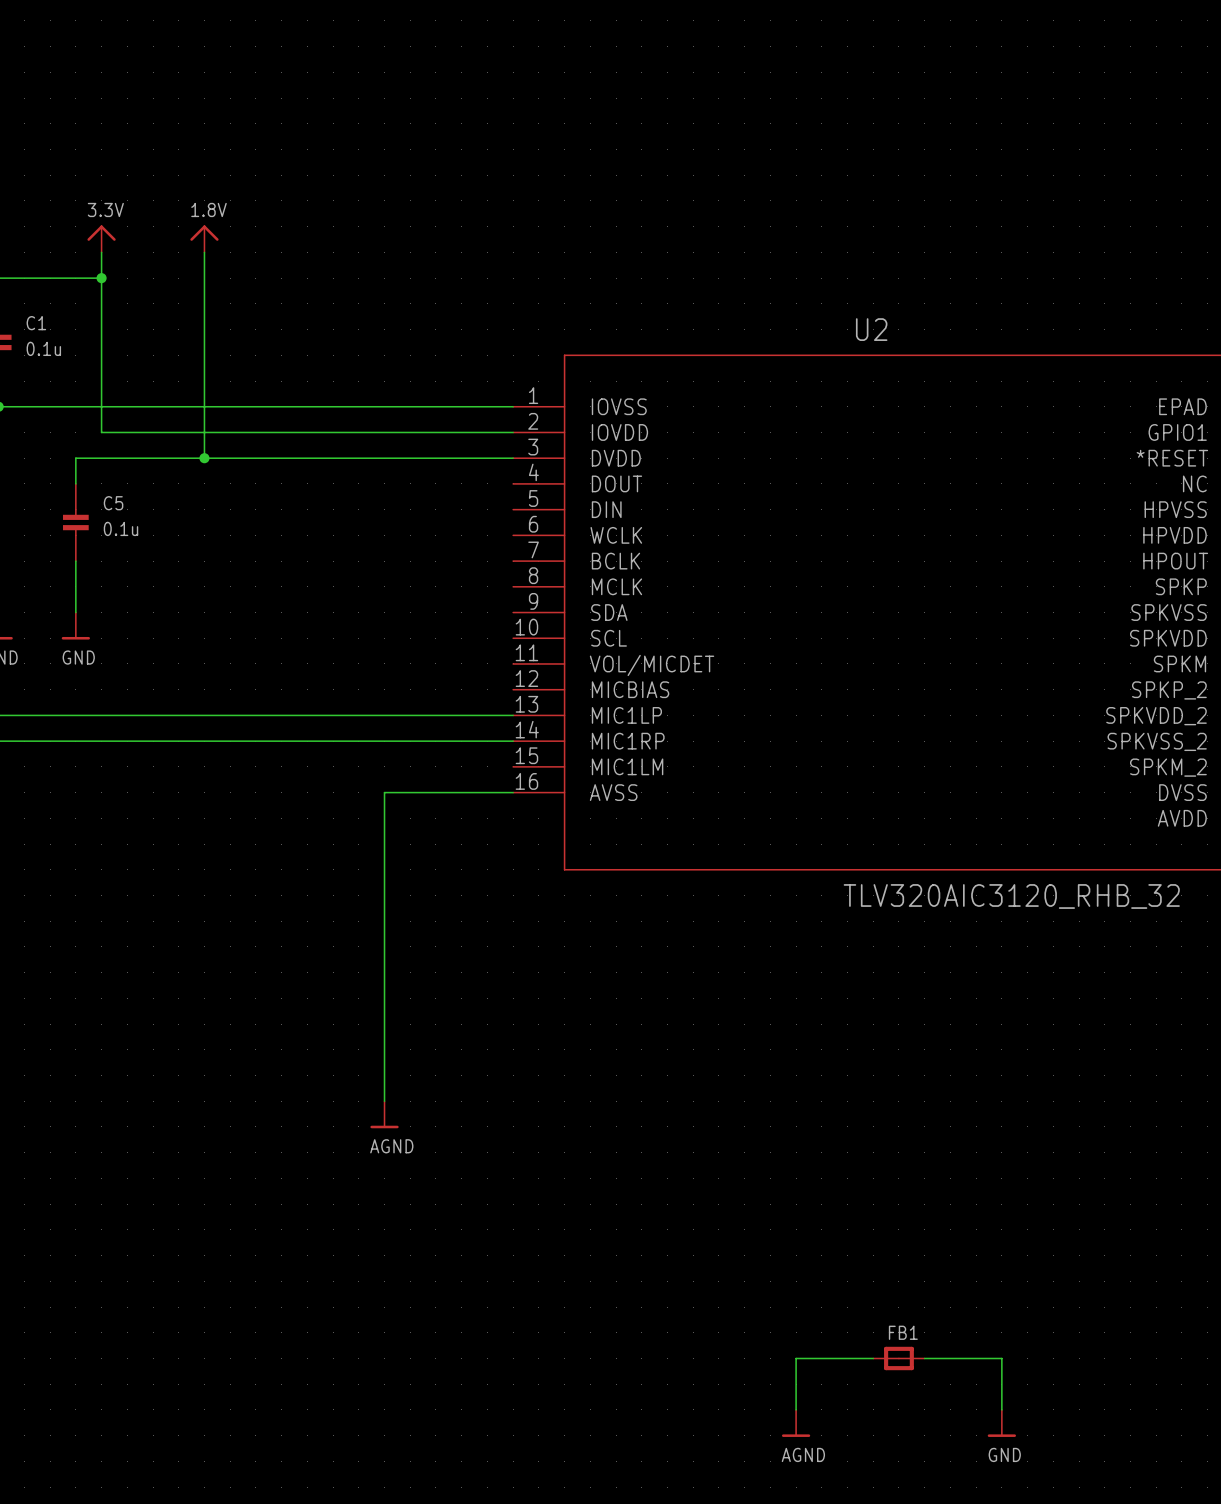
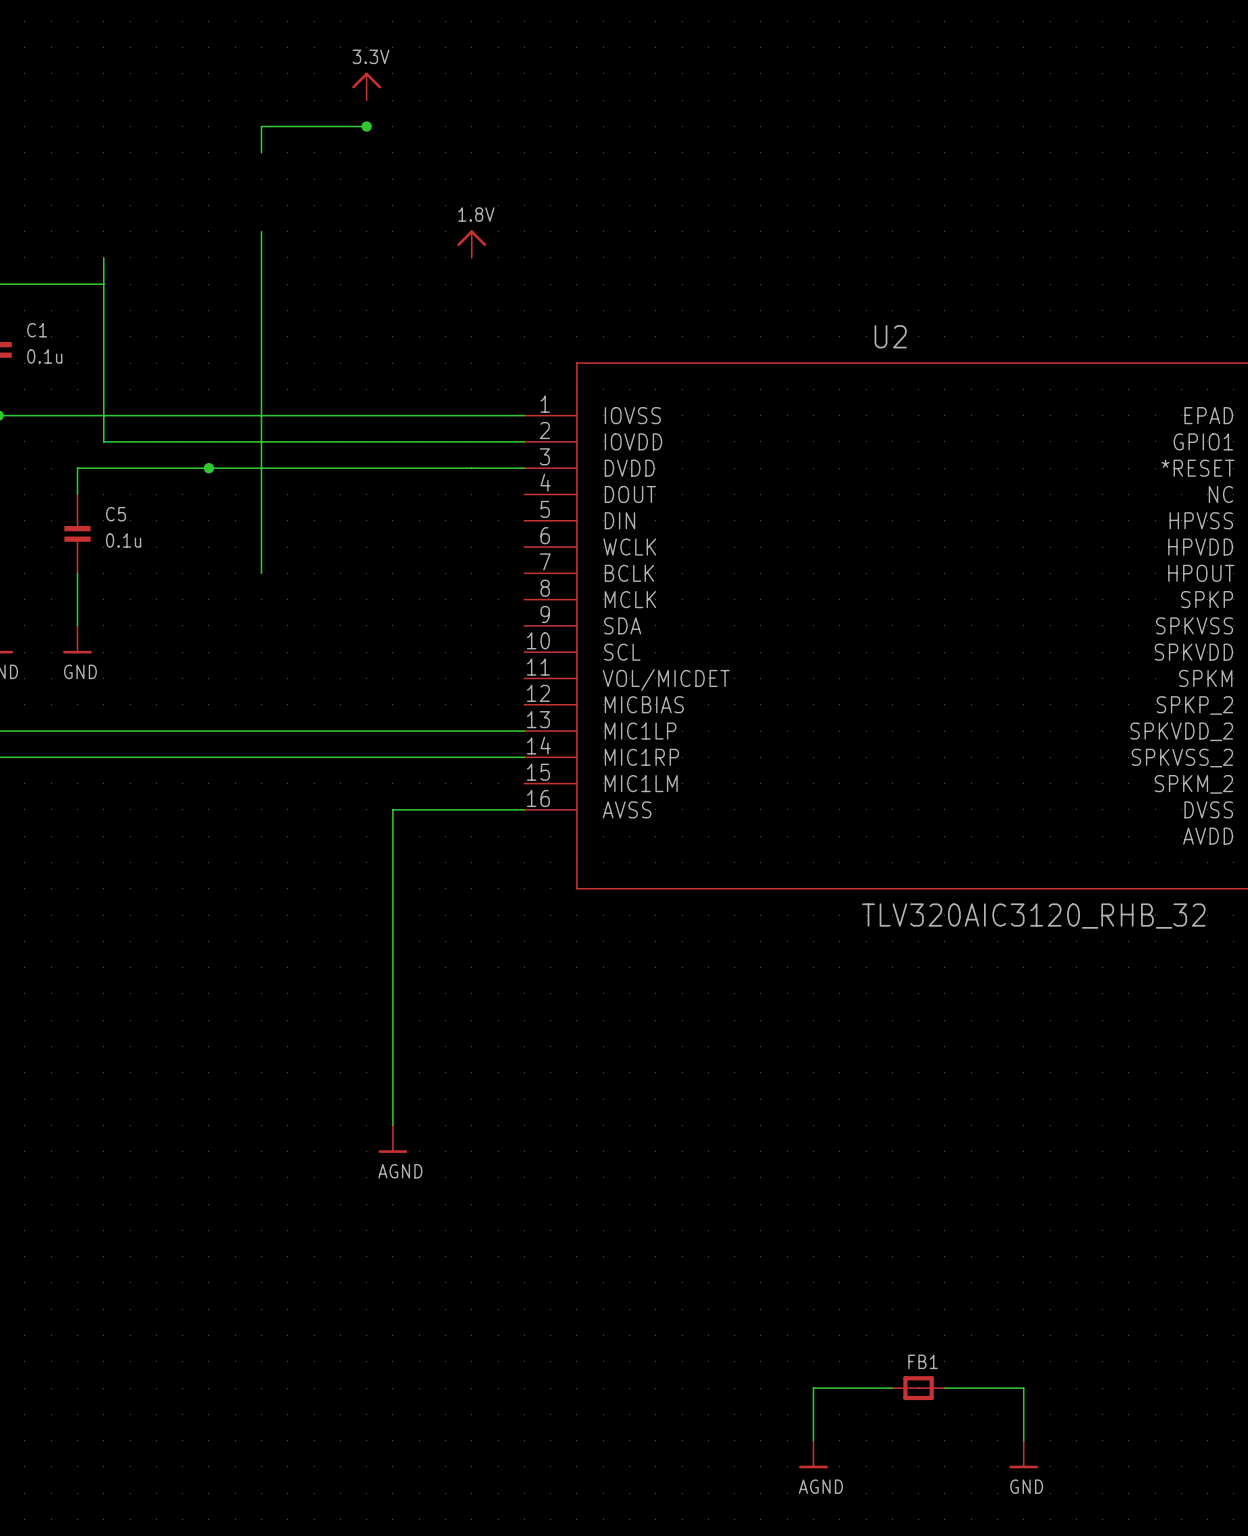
power symbol: none -> 3.3V (366, 86)
wire: none -> (366, 126) (261, 126) (261, 152)
junction: none -> (366, 126)
wire: none -> (261, 231) (261, 573)
power symbol: 3.3V (101, 238) -> none
power symbol: 1.8V (204, 238) -> none
power symbol: none -> 1.8V (471, 244)
wire: (204, 252) (204, 458) -> none
junction: (101, 278) -> none

